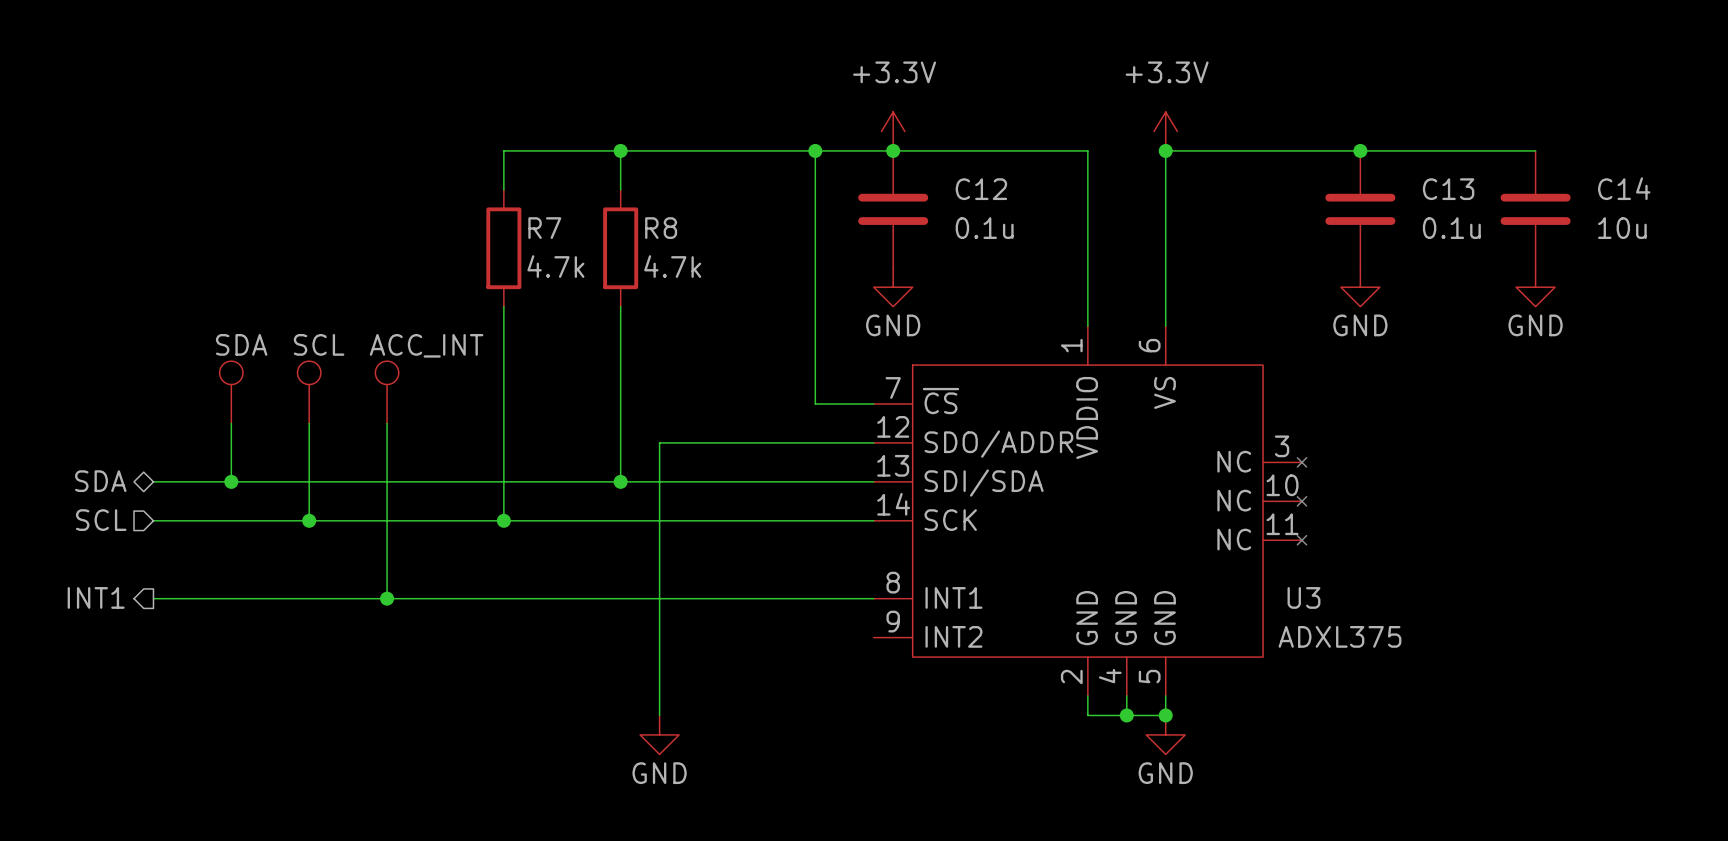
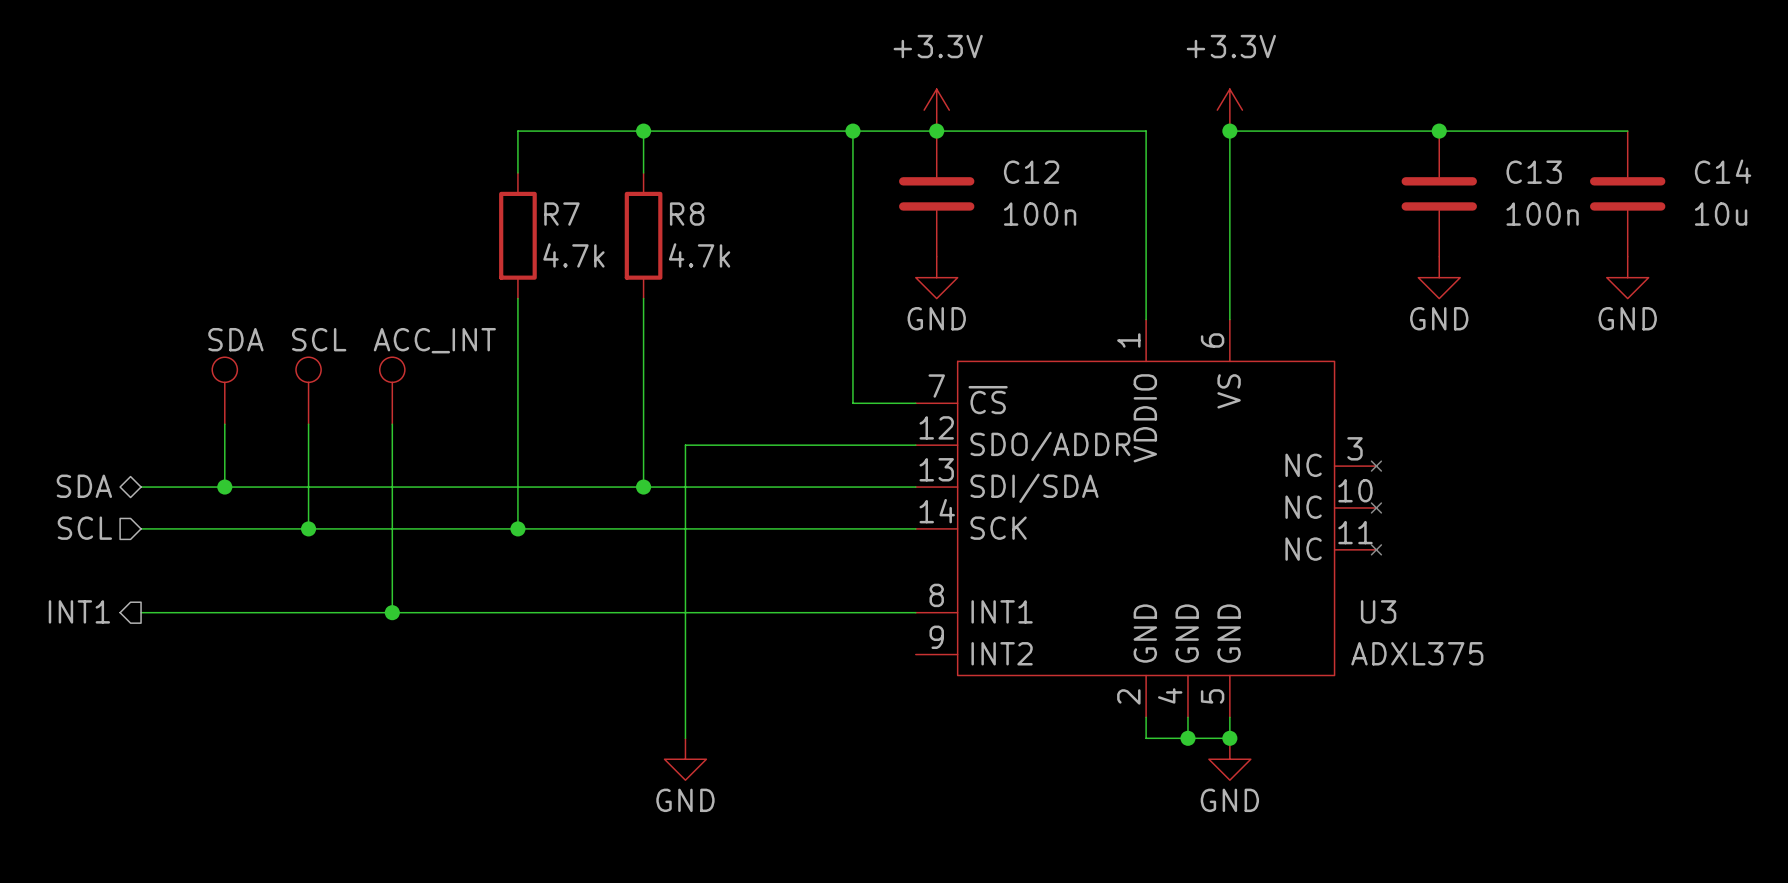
C12 value: 0.1u (984, 228) -> 100n (1040, 214)
C13 value: 0.1u (1451, 228) -> 100n (1542, 214)

